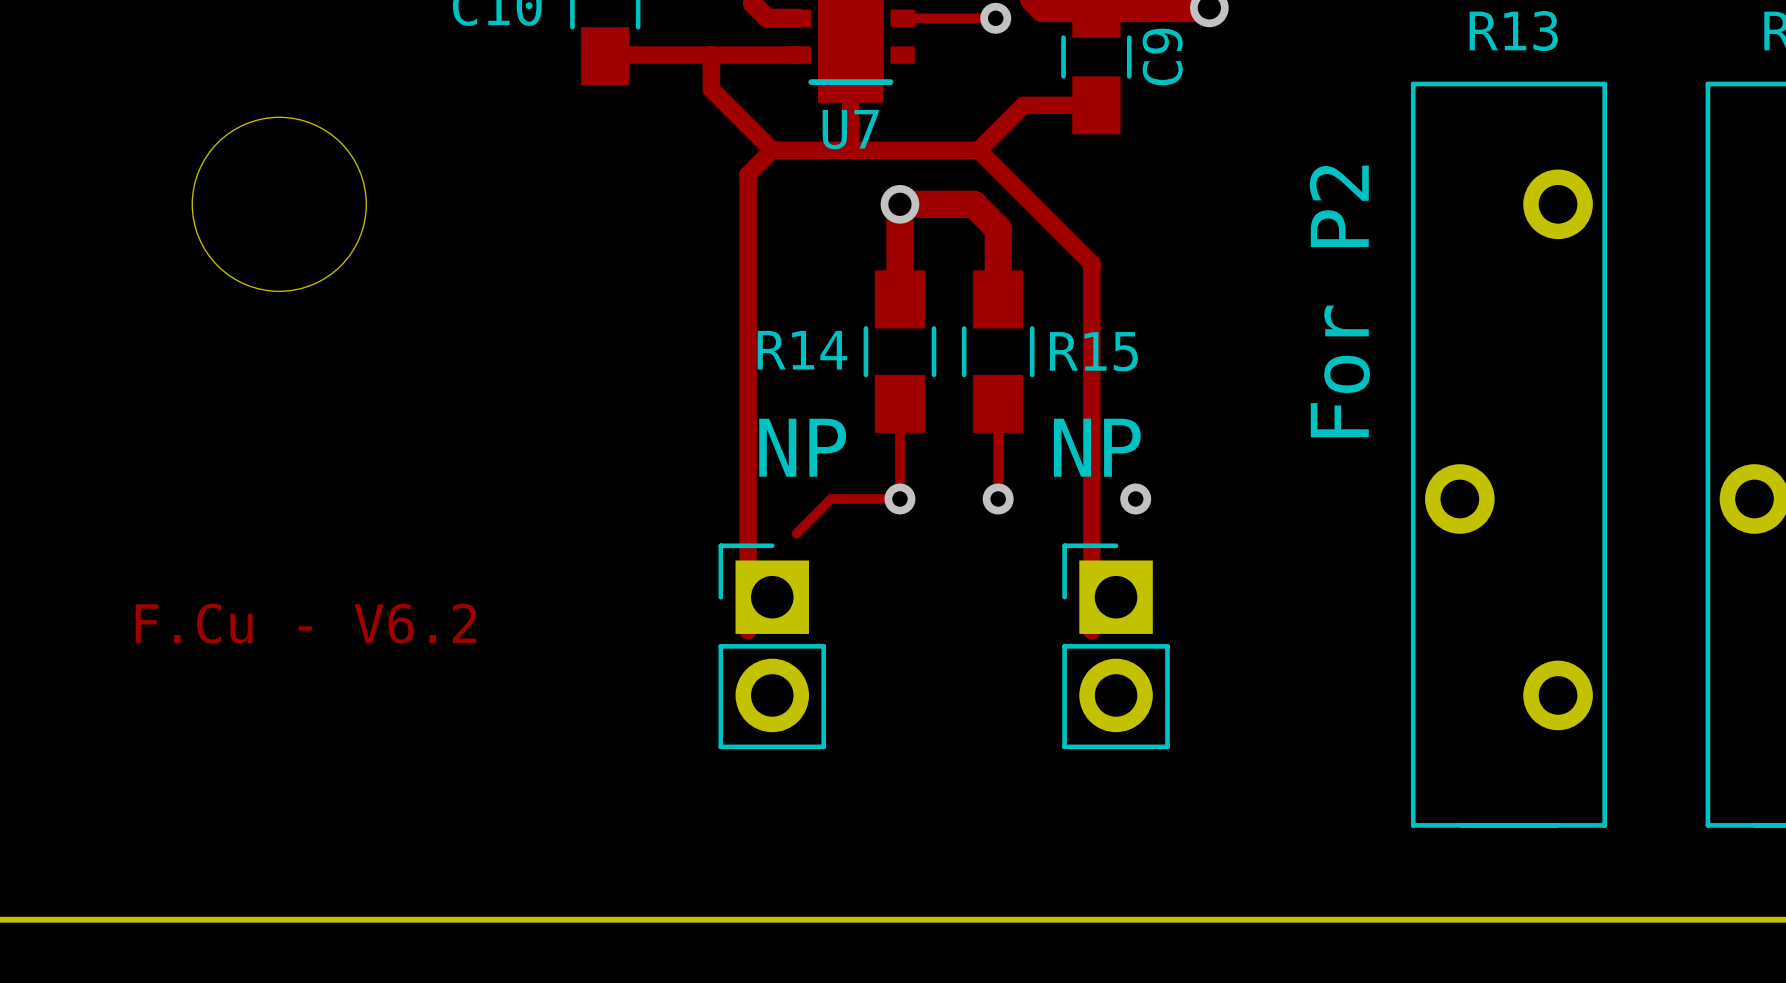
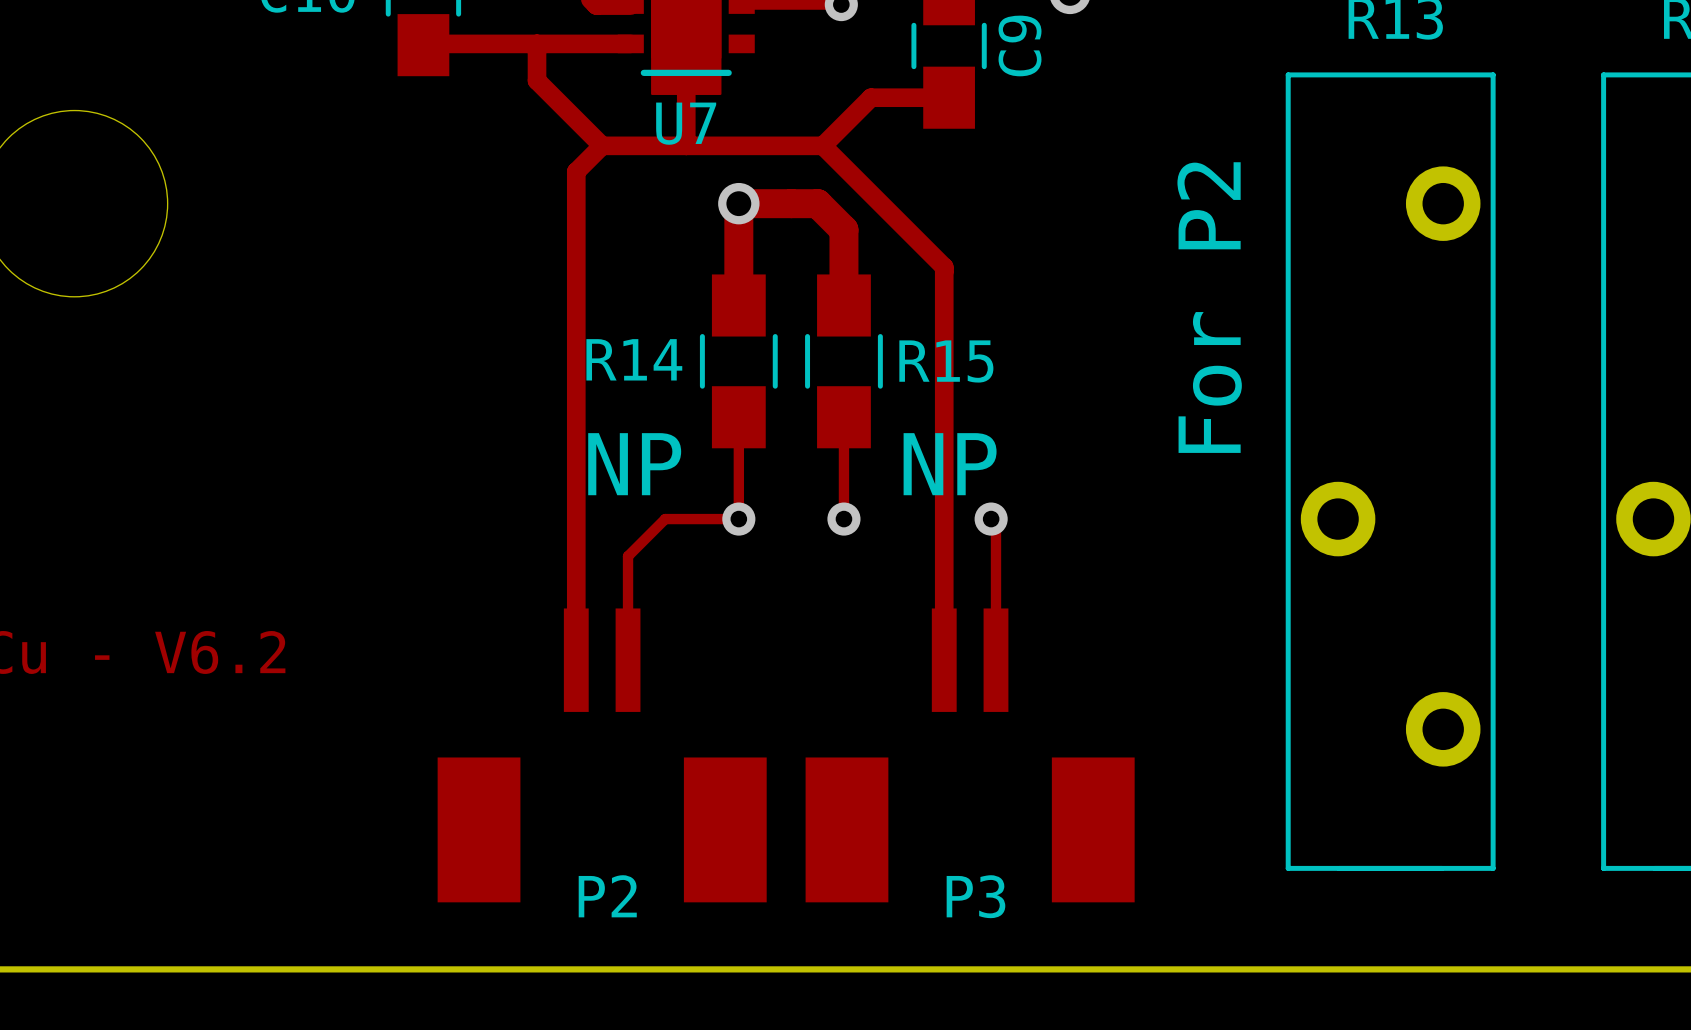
track: none -> (995, 523) (995, 660)
track: none -> (628, 556) (628, 660)
part: (772, 646) -> none
part: (1116, 646) -> none
P2: none -> (602, 755)
P3: none -> (970, 755)

